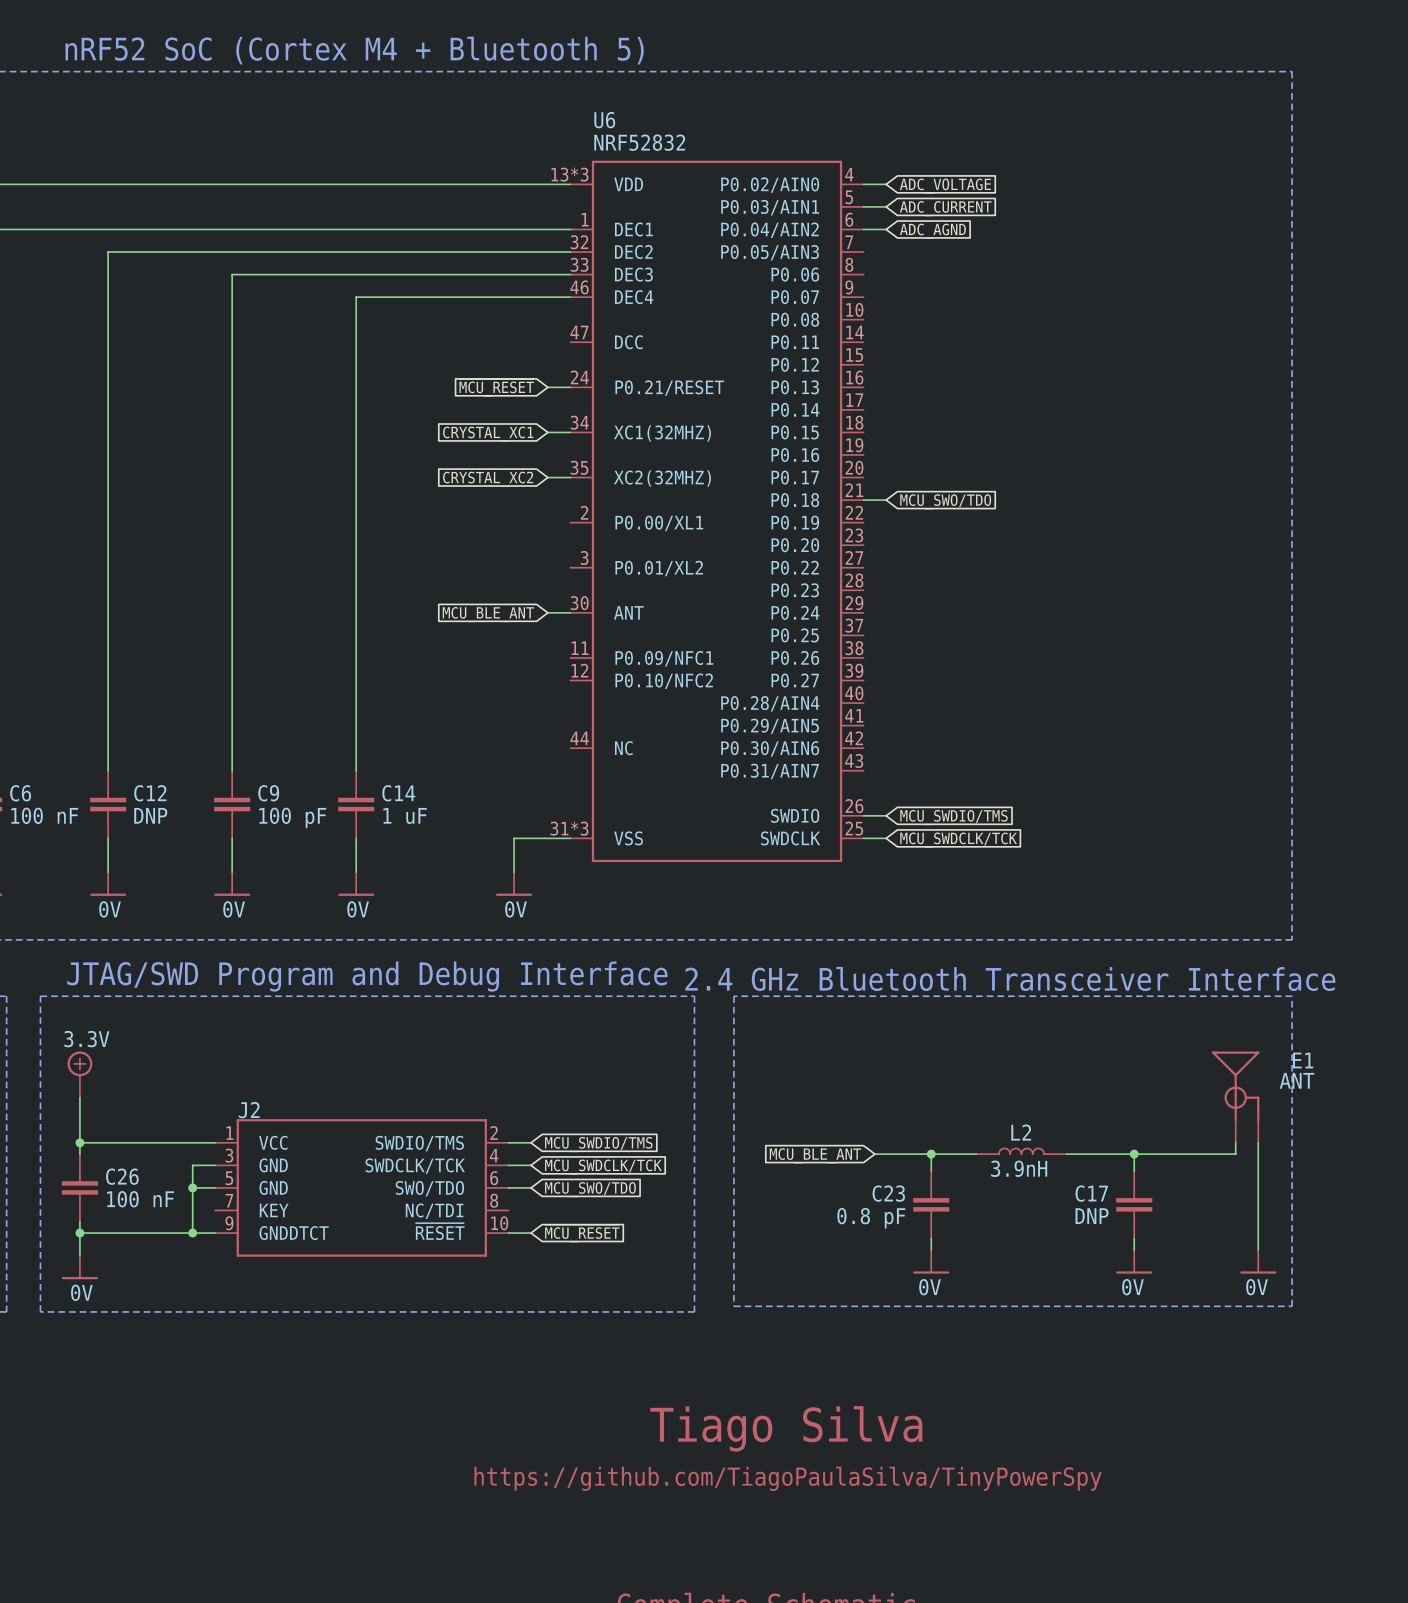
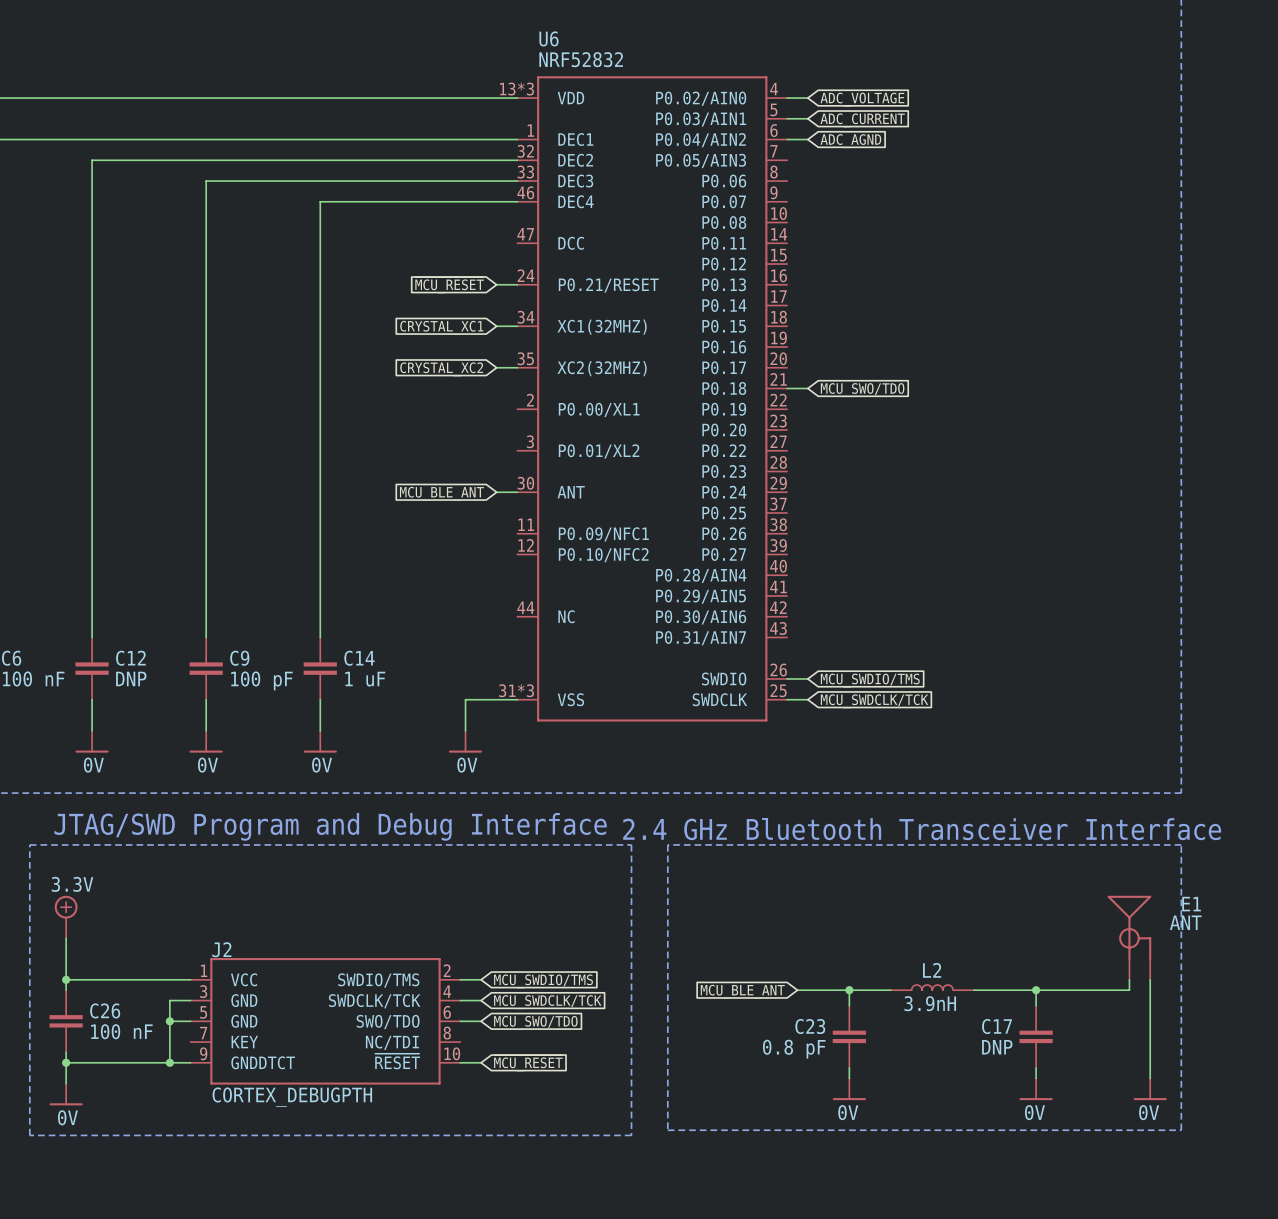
J2 value: none -> CORTEX_DEBUGPTH (292, 1097)

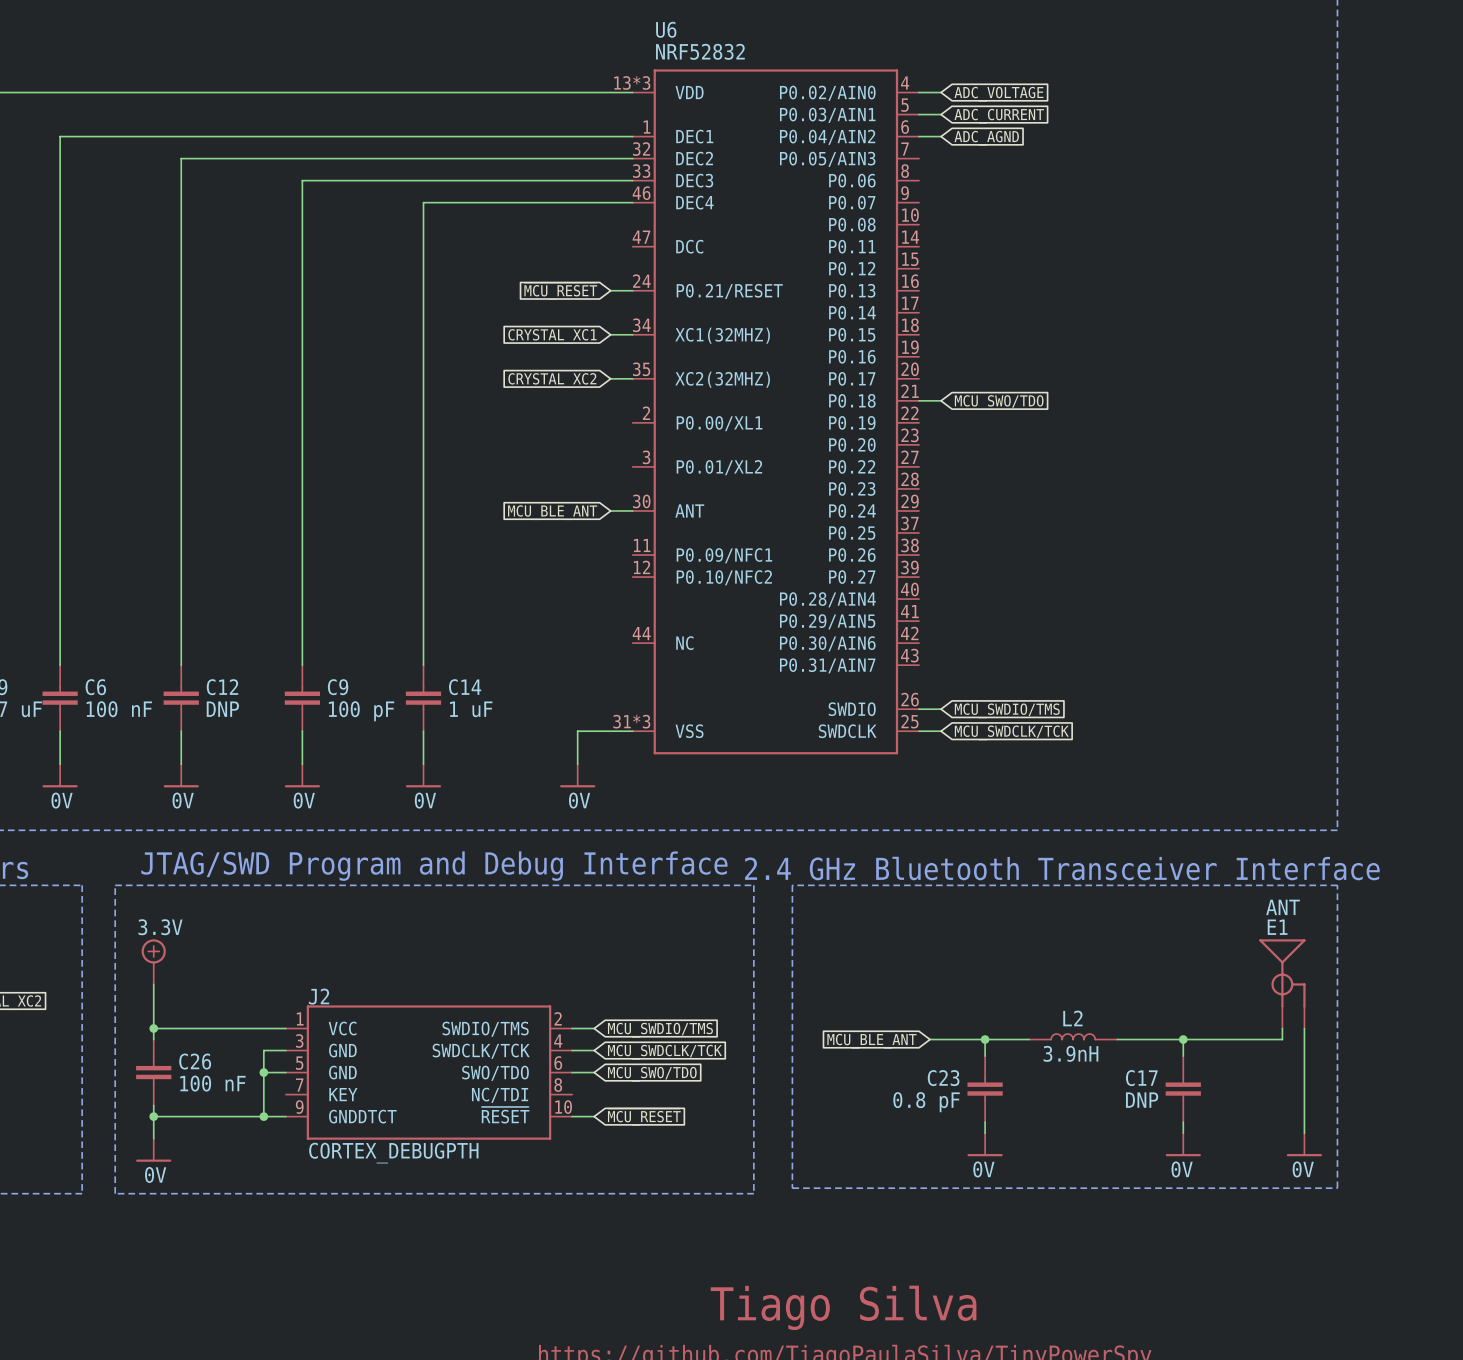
E1 name position: E1 (1191, 904) -> E1 (1277, 927)
E1 value position: ANT (1185, 922) -> ANT (1283, 907)

